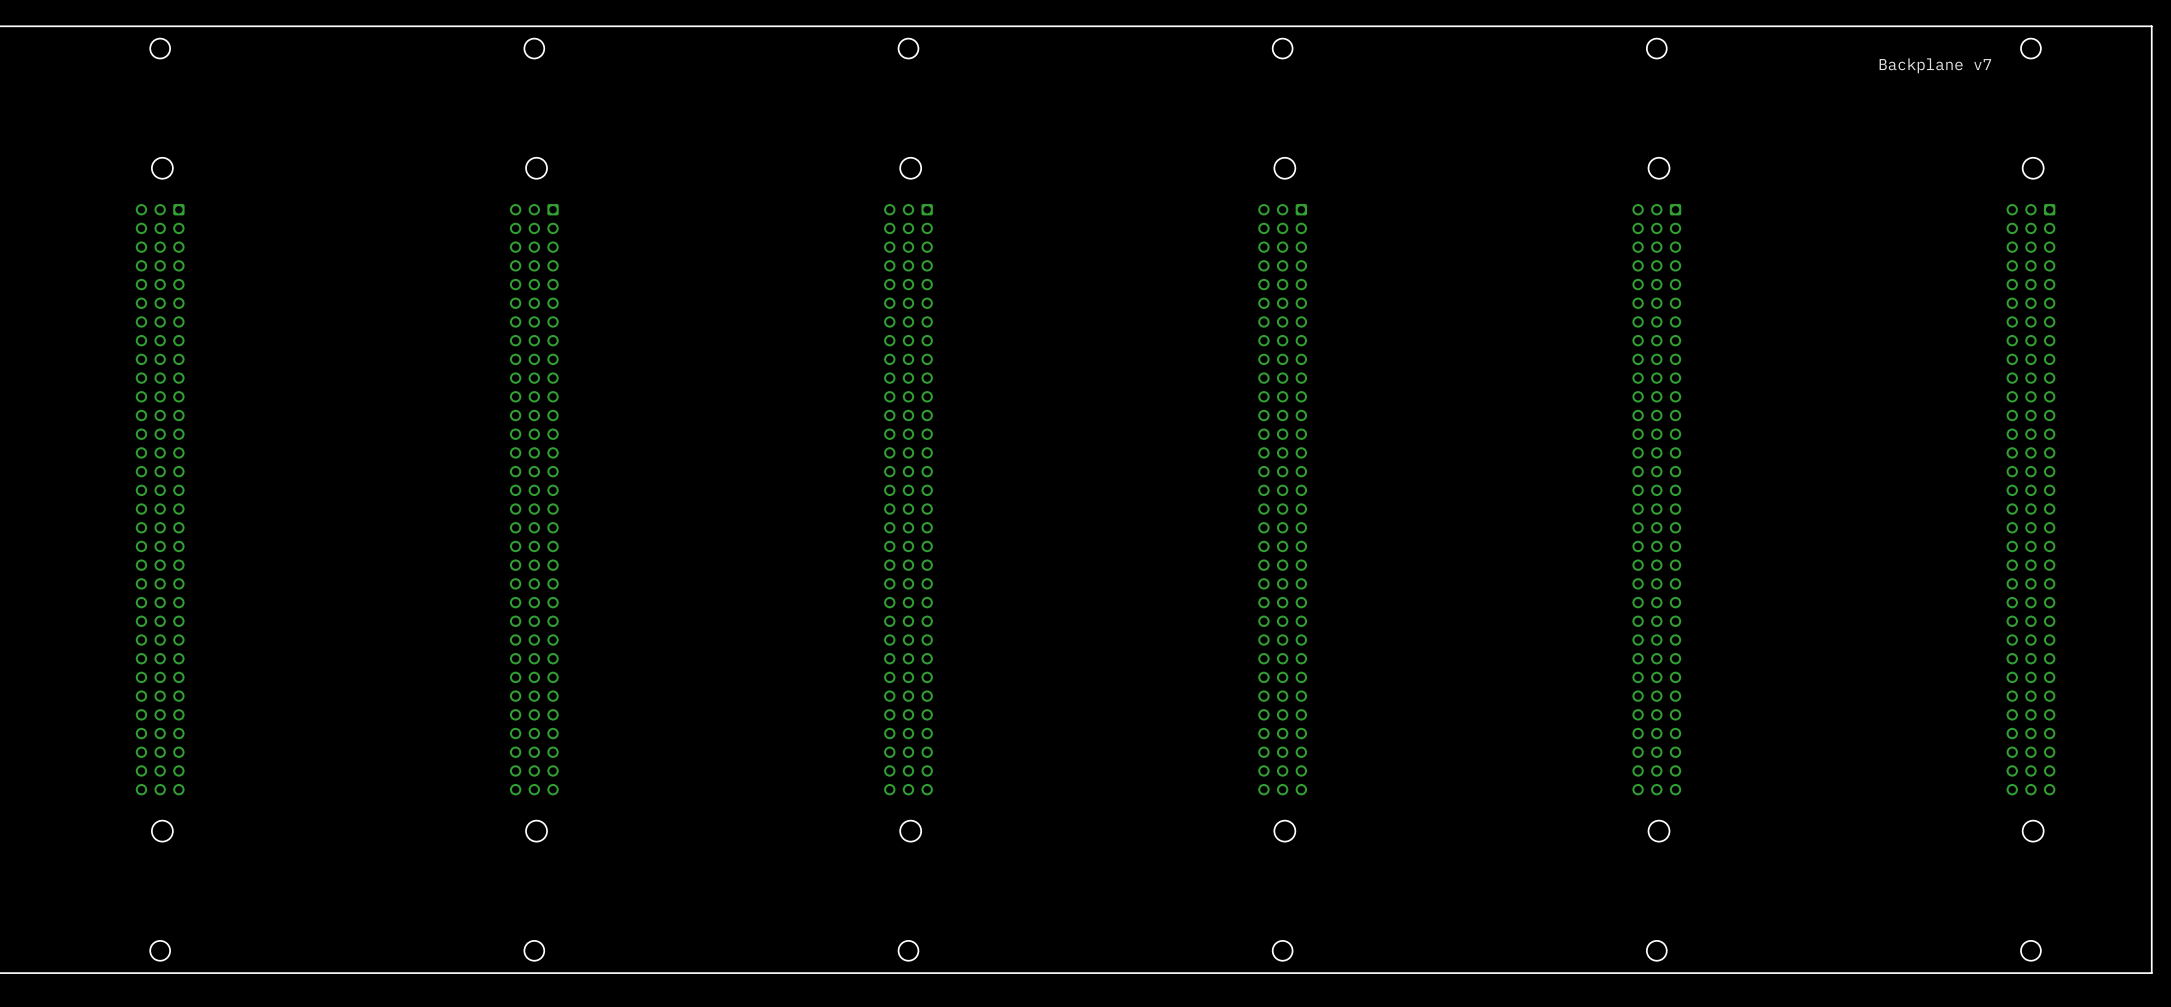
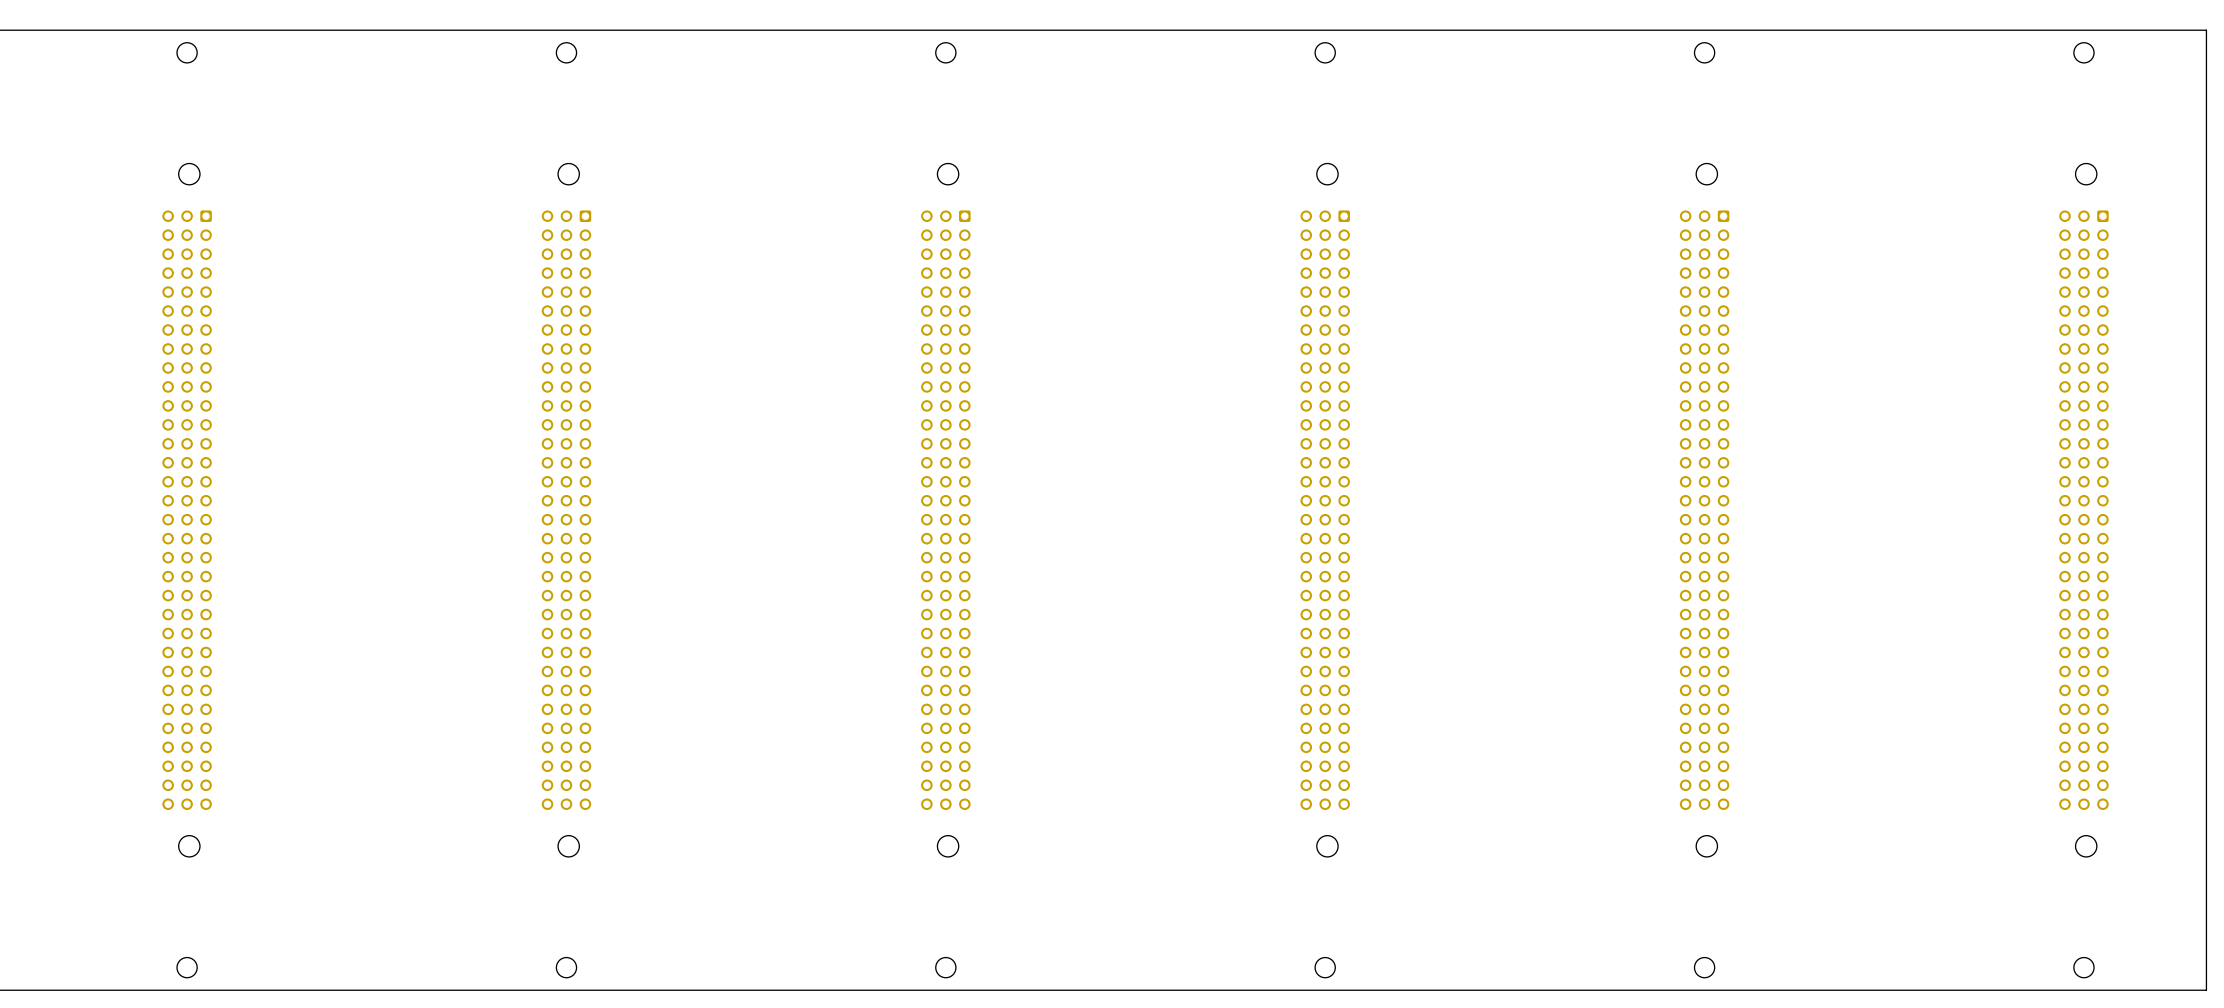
text: Backplane v7 (1935, 65) -> none

